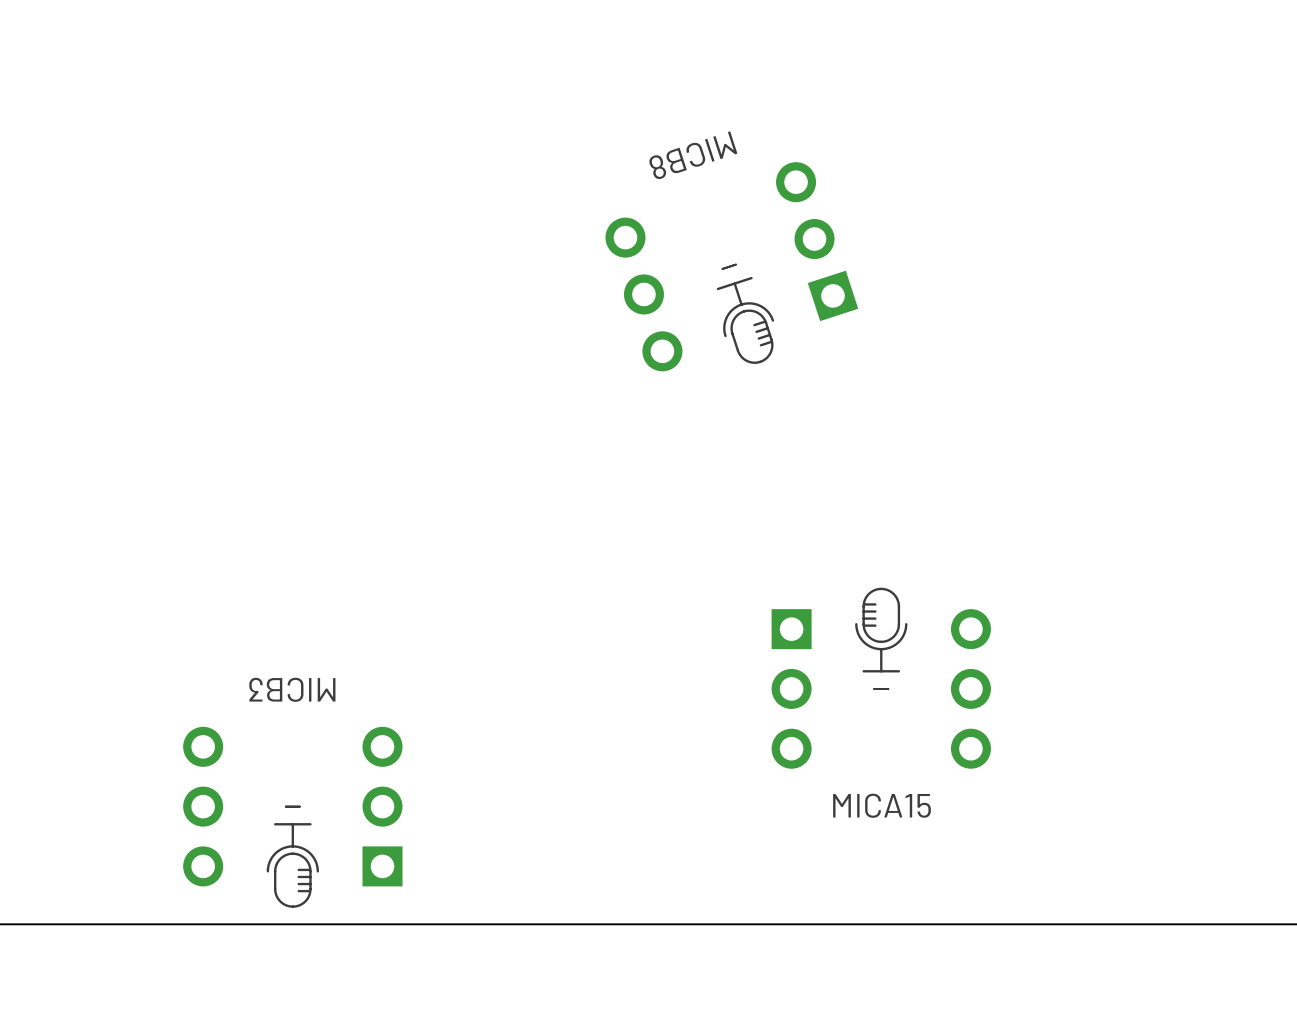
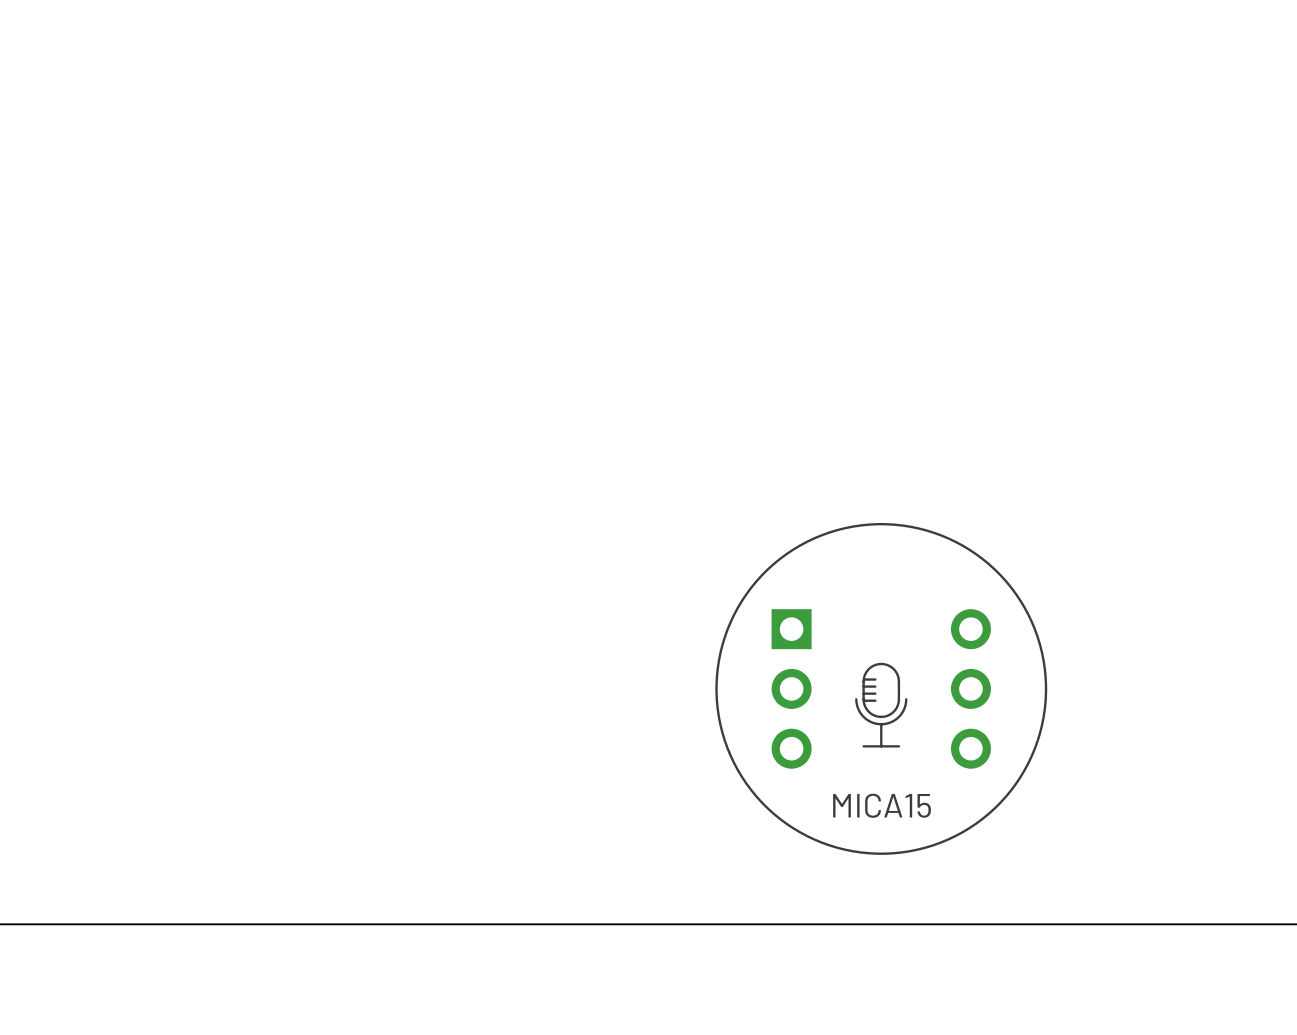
MICB8: (731, 266) -> none
MICA15 footprint: [771, 587, 991, 769] -> [715, 522, 1048, 855]
MICB3: (292, 817) -> none

